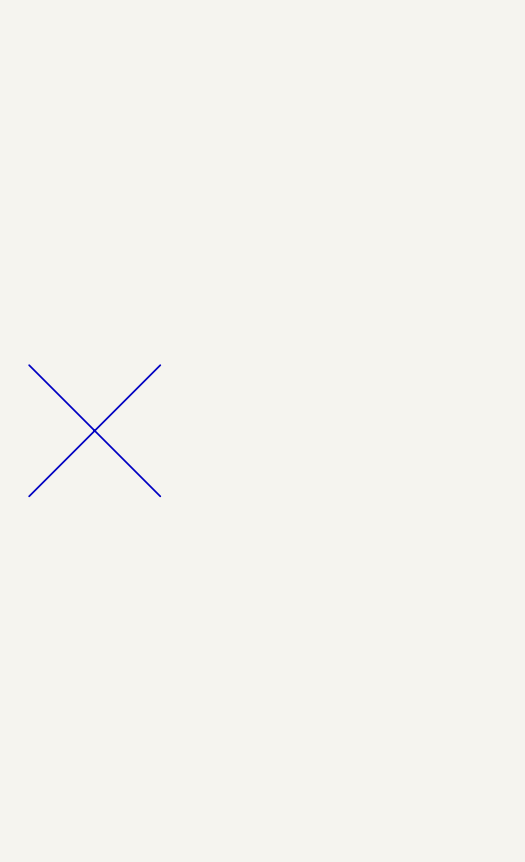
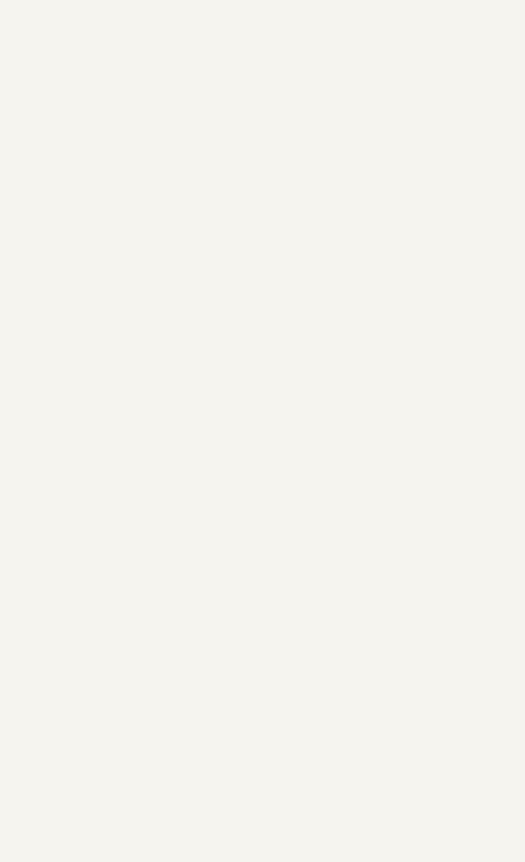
no-connect mark: (94, 430) -> none

